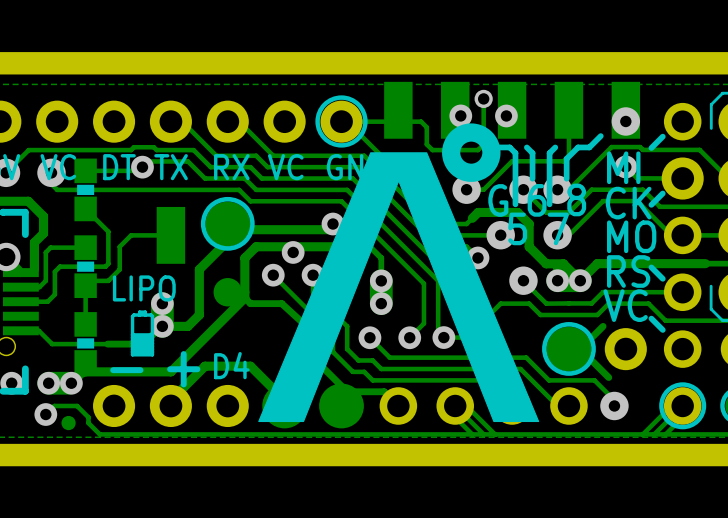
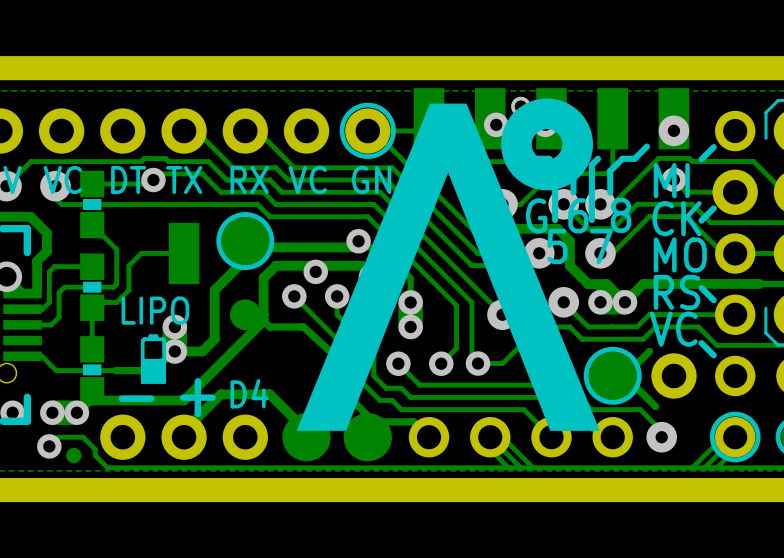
drawing: none -> [296, 98, 600, 431]
drawing: [258, 123, 540, 423] -> none

